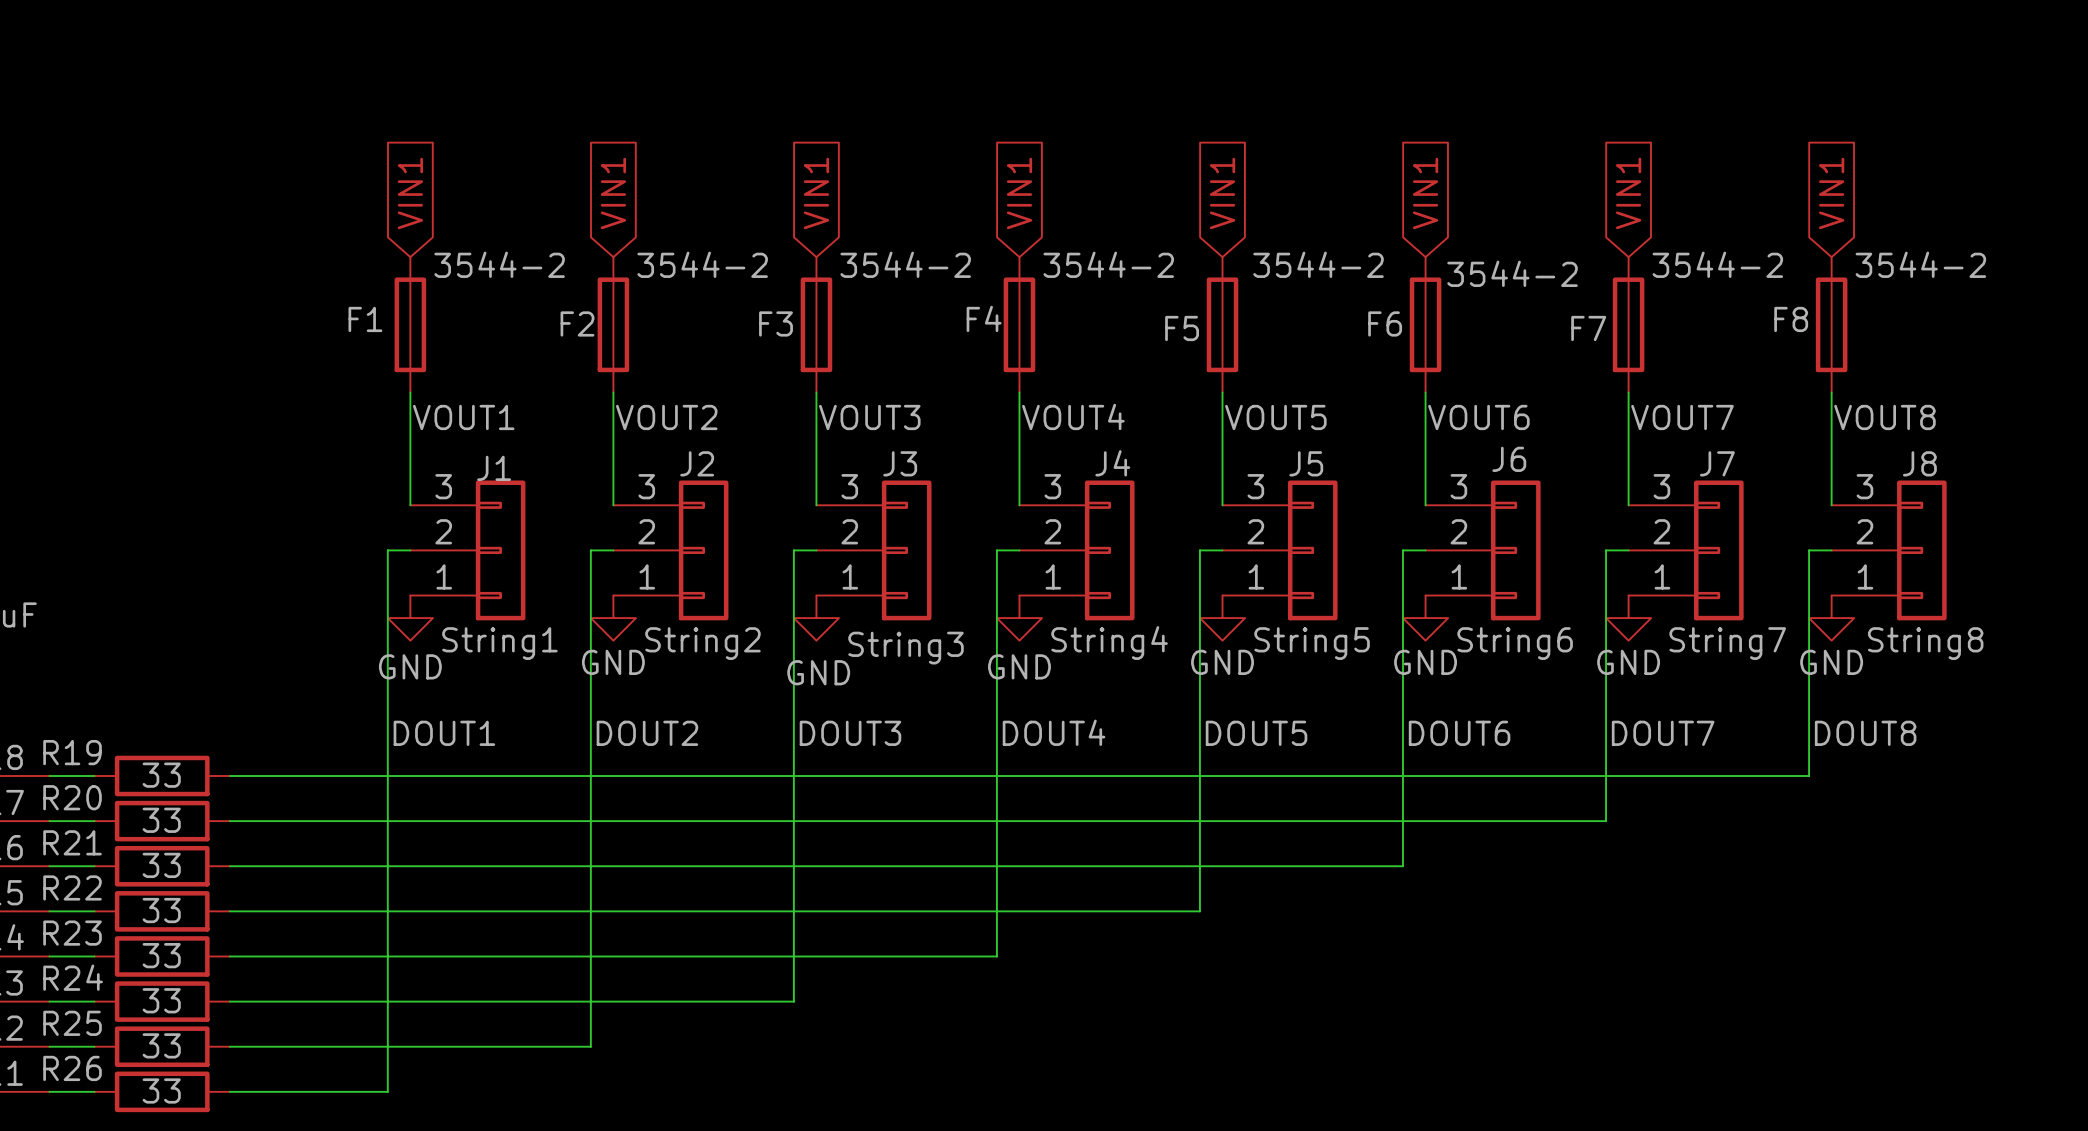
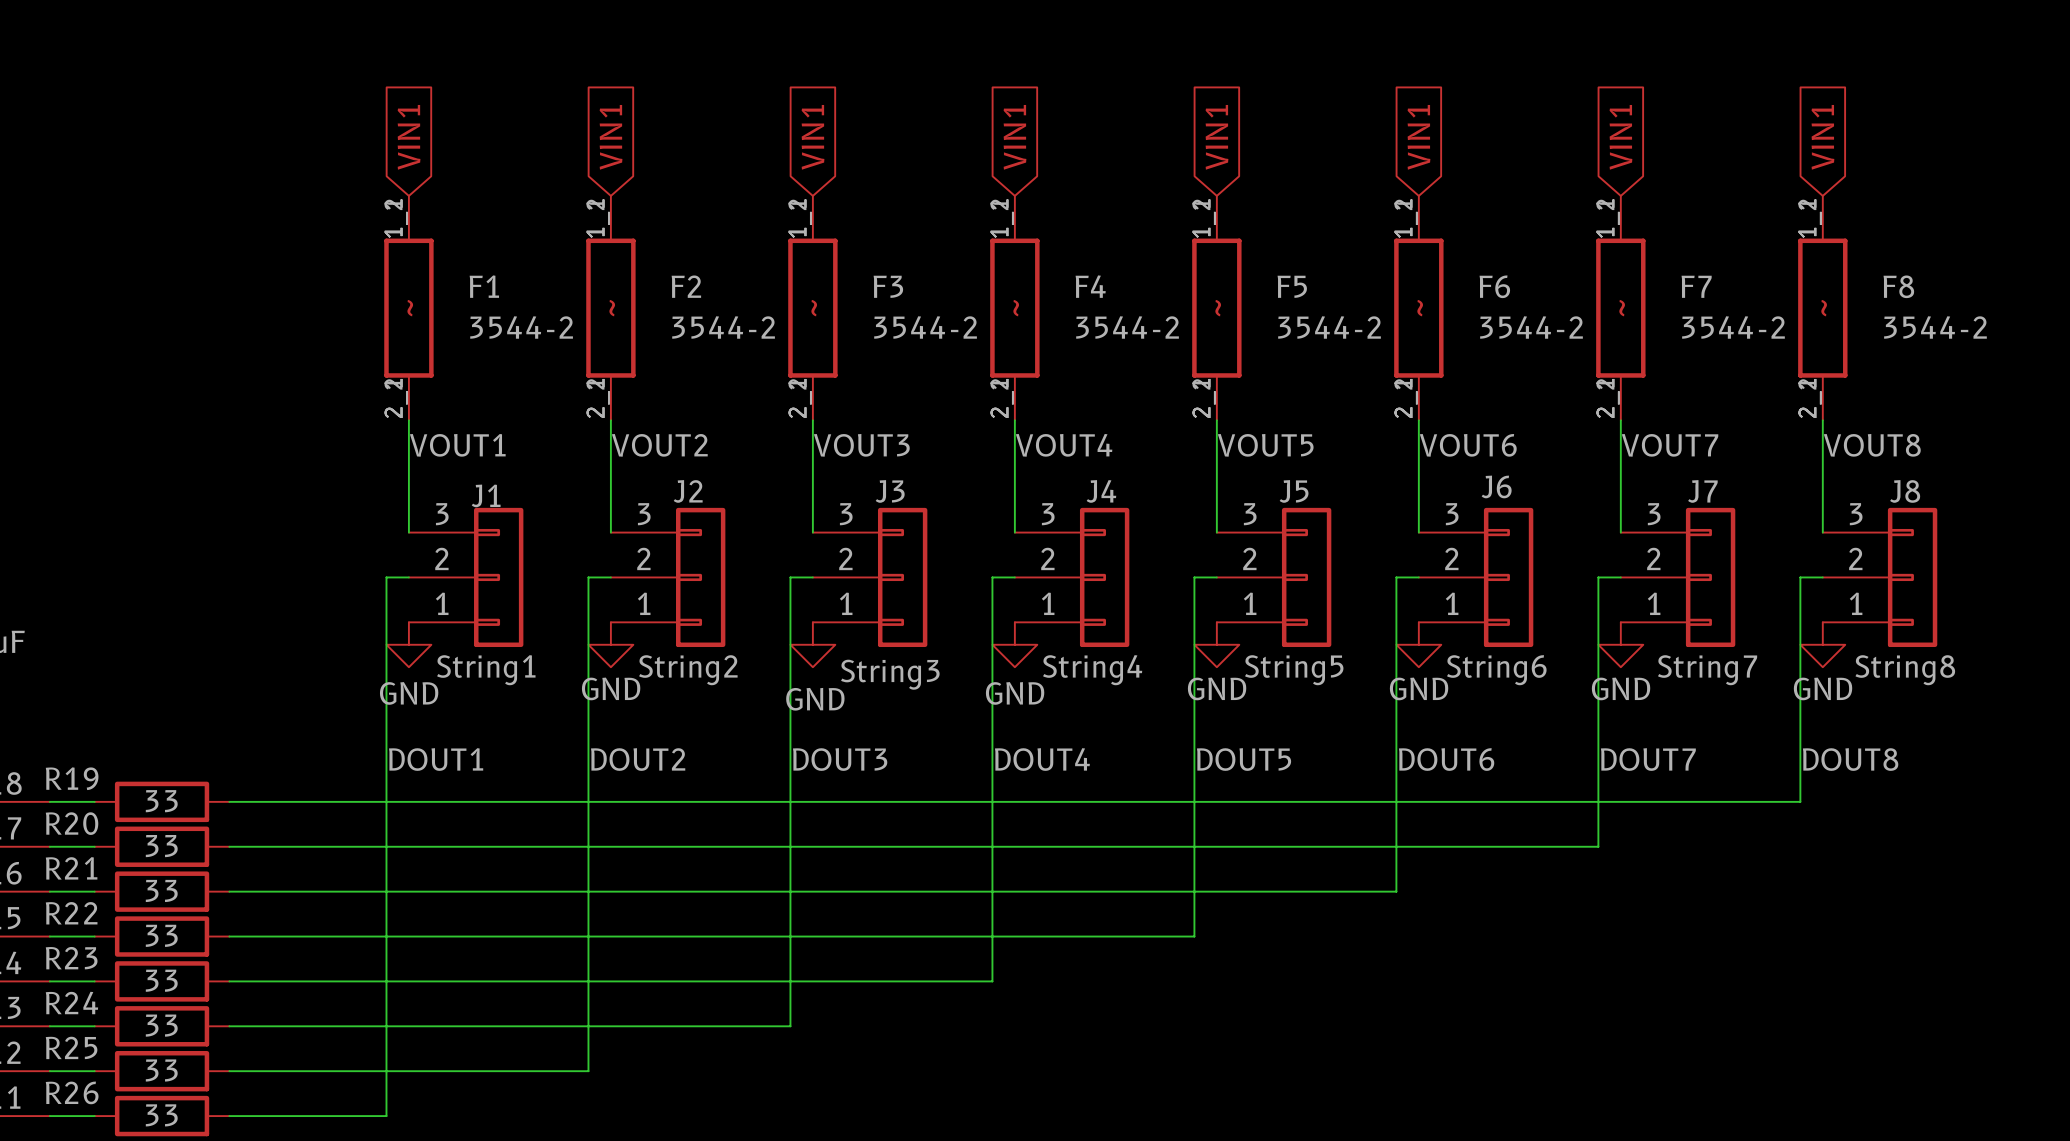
global label position: VIN1 (410, 193) -> VIN1 (409, 137)
global label position: VIN1 (613, 193) -> VIN1 (611, 137)
global label position: VIN1 (816, 193) -> VIN1 (813, 137)
global label position: VIN1 (1019, 193) -> VIN1 (1015, 137)
global label position: VIN1 (1222, 193) -> VIN1 (1217, 137)
global label position: VIN1 (1425, 193) -> VIN1 (1418, 137)
global label position: VIN1 (1628, 193) -> VIN1 (1620, 137)
global label position: VIN1 (1831, 193) -> VIN1 (1822, 137)
F1 symbol: [394, 257, 427, 393] -> [384, 195, 434, 421]
F2 symbol: [597, 257, 630, 393] -> [586, 195, 636, 421]
F3 symbol: [800, 257, 833, 393] -> [788, 195, 838, 421]
F4 symbol: [1003, 257, 1036, 393] -> [990, 195, 1040, 421]
F5 symbol: [1206, 257, 1239, 393] -> [1192, 195, 1242, 421]
F6 symbol: [1409, 257, 1442, 393] -> [1394, 195, 1444, 421]
F7 symbol: [1612, 257, 1645, 393] -> [1596, 195, 1646, 421]
F8 symbol: [1815, 257, 1848, 393] -> [1798, 195, 1848, 421]
F1 value position: 3544-2 (499, 264) -> 3544-2 (521, 327)
F2 value position: 3544-2 (702, 264) -> 3544-2 (723, 327)
F3 value position: 3544-2 (905, 264) -> 3544-2 (925, 327)
F4 value position: 3544-2 (1108, 264) -> 3544-2 (1127, 327)
F5 value position: 3544-2 (1318, 264) -> 3544-2 (1329, 327)
F7 value position: 3544-2 (1717, 264) -> 3544-2 (1733, 327)
F8 value position: 3544-2 (1920, 264) -> 3544-2 (1935, 327)
F6 value position: 3544-2 (1512, 273) -> 3544-2 (1531, 327)
F4 name position: F4 (984, 318) -> F4 (1090, 286)
F1 name position: F1 (365, 319) -> F1 (484, 286)
F8 name position: F8 (1791, 319) -> F8 (1898, 286)
F2 name position: F2 (577, 323) -> F2 (686, 286)
F3 name position: F3 (776, 323) -> F3 (888, 286)
F6 name position: F6 (1385, 323) -> F6 (1494, 286)
F5 name position: F5 (1182, 328) -> F5 (1292, 286)
F7 name position: F7 (1588, 328) -> F7 (1696, 286)

